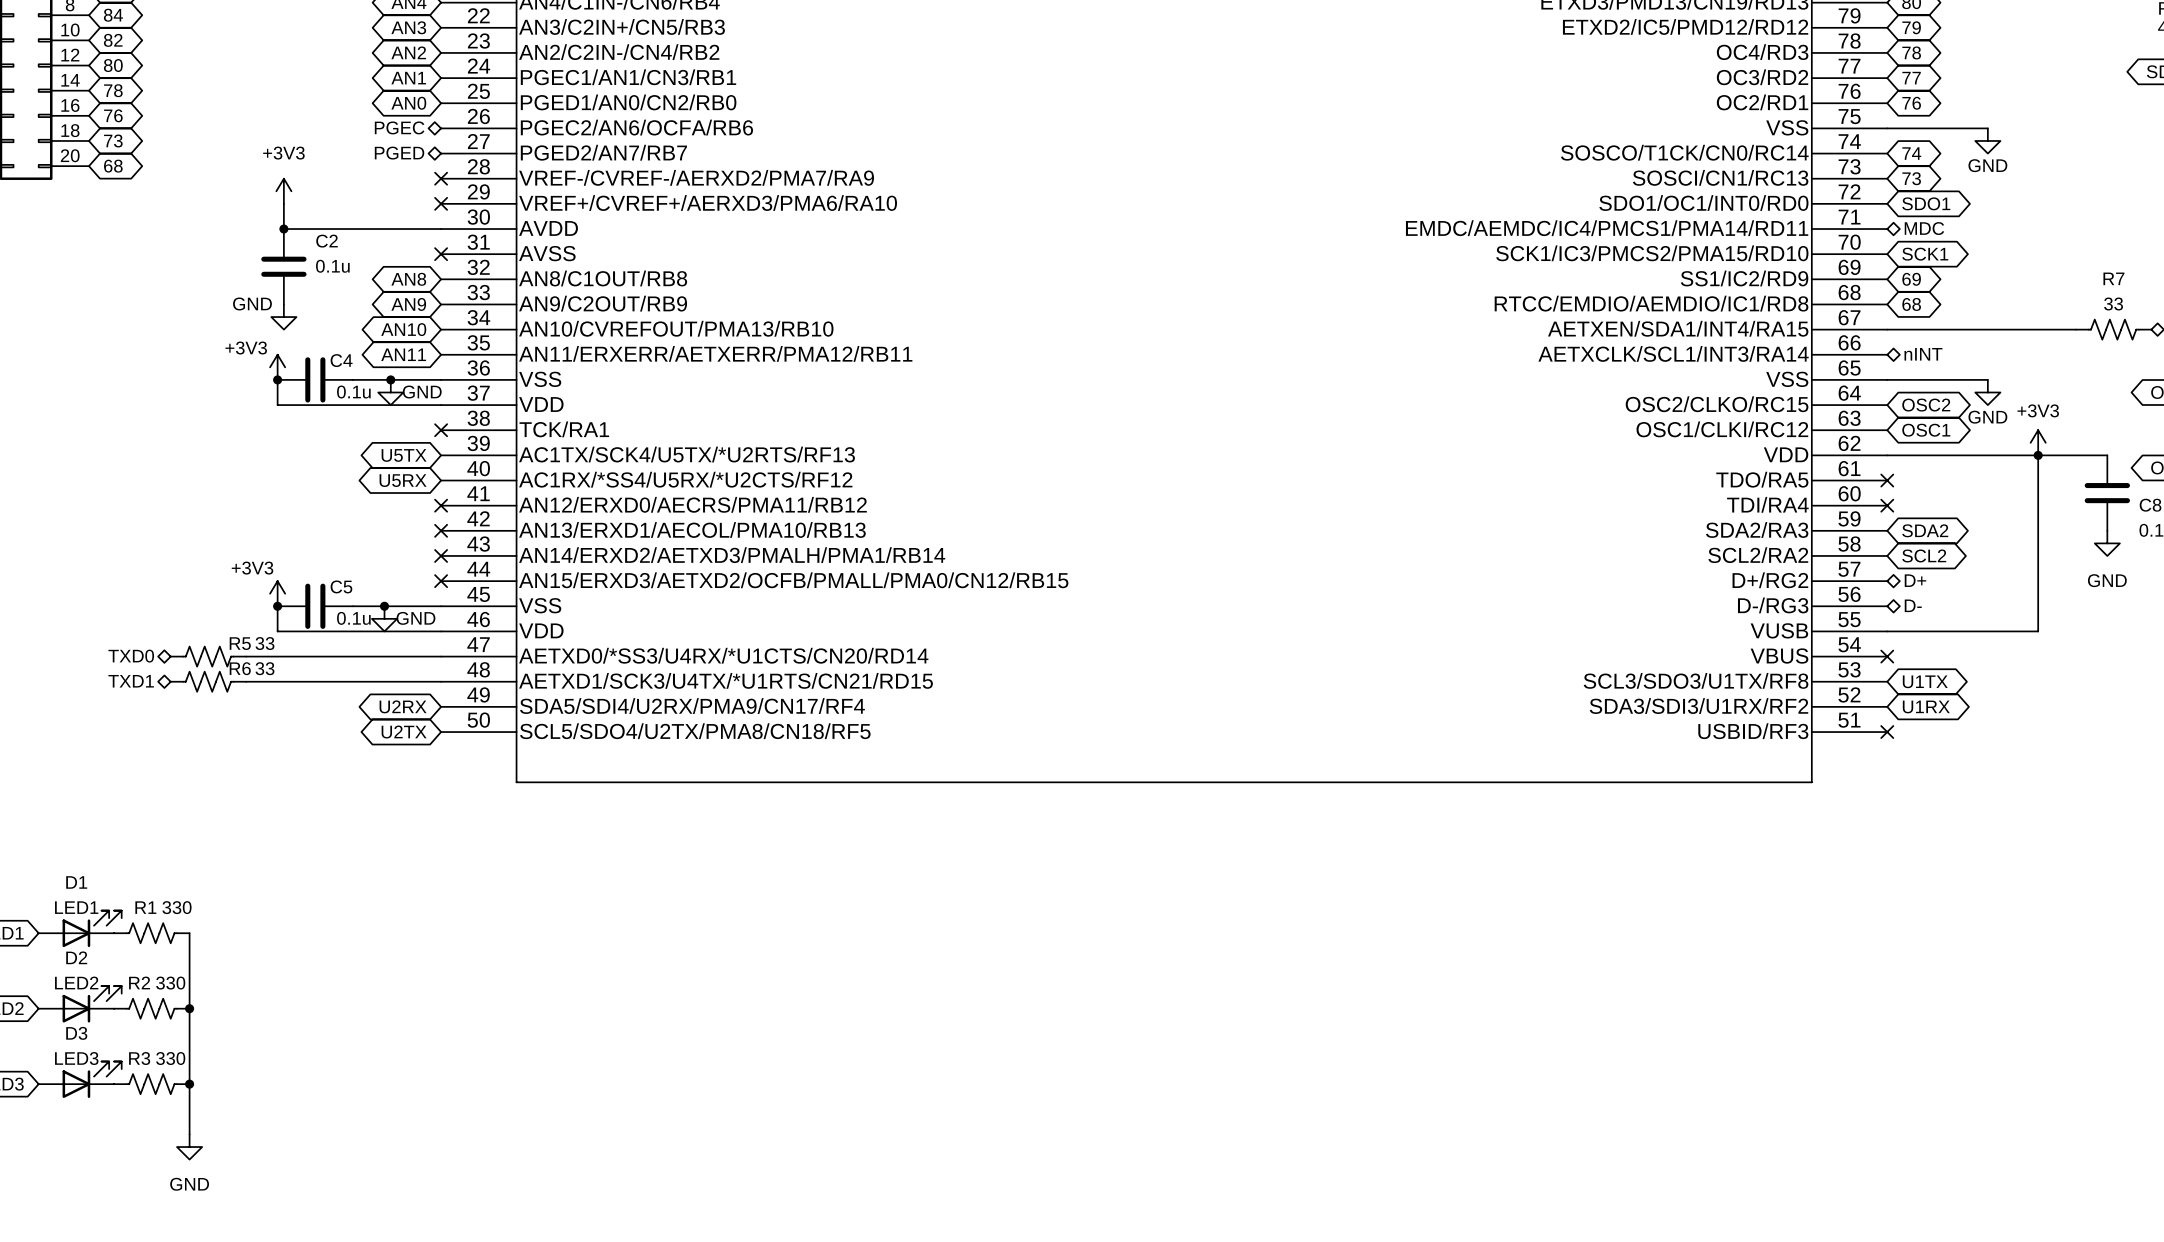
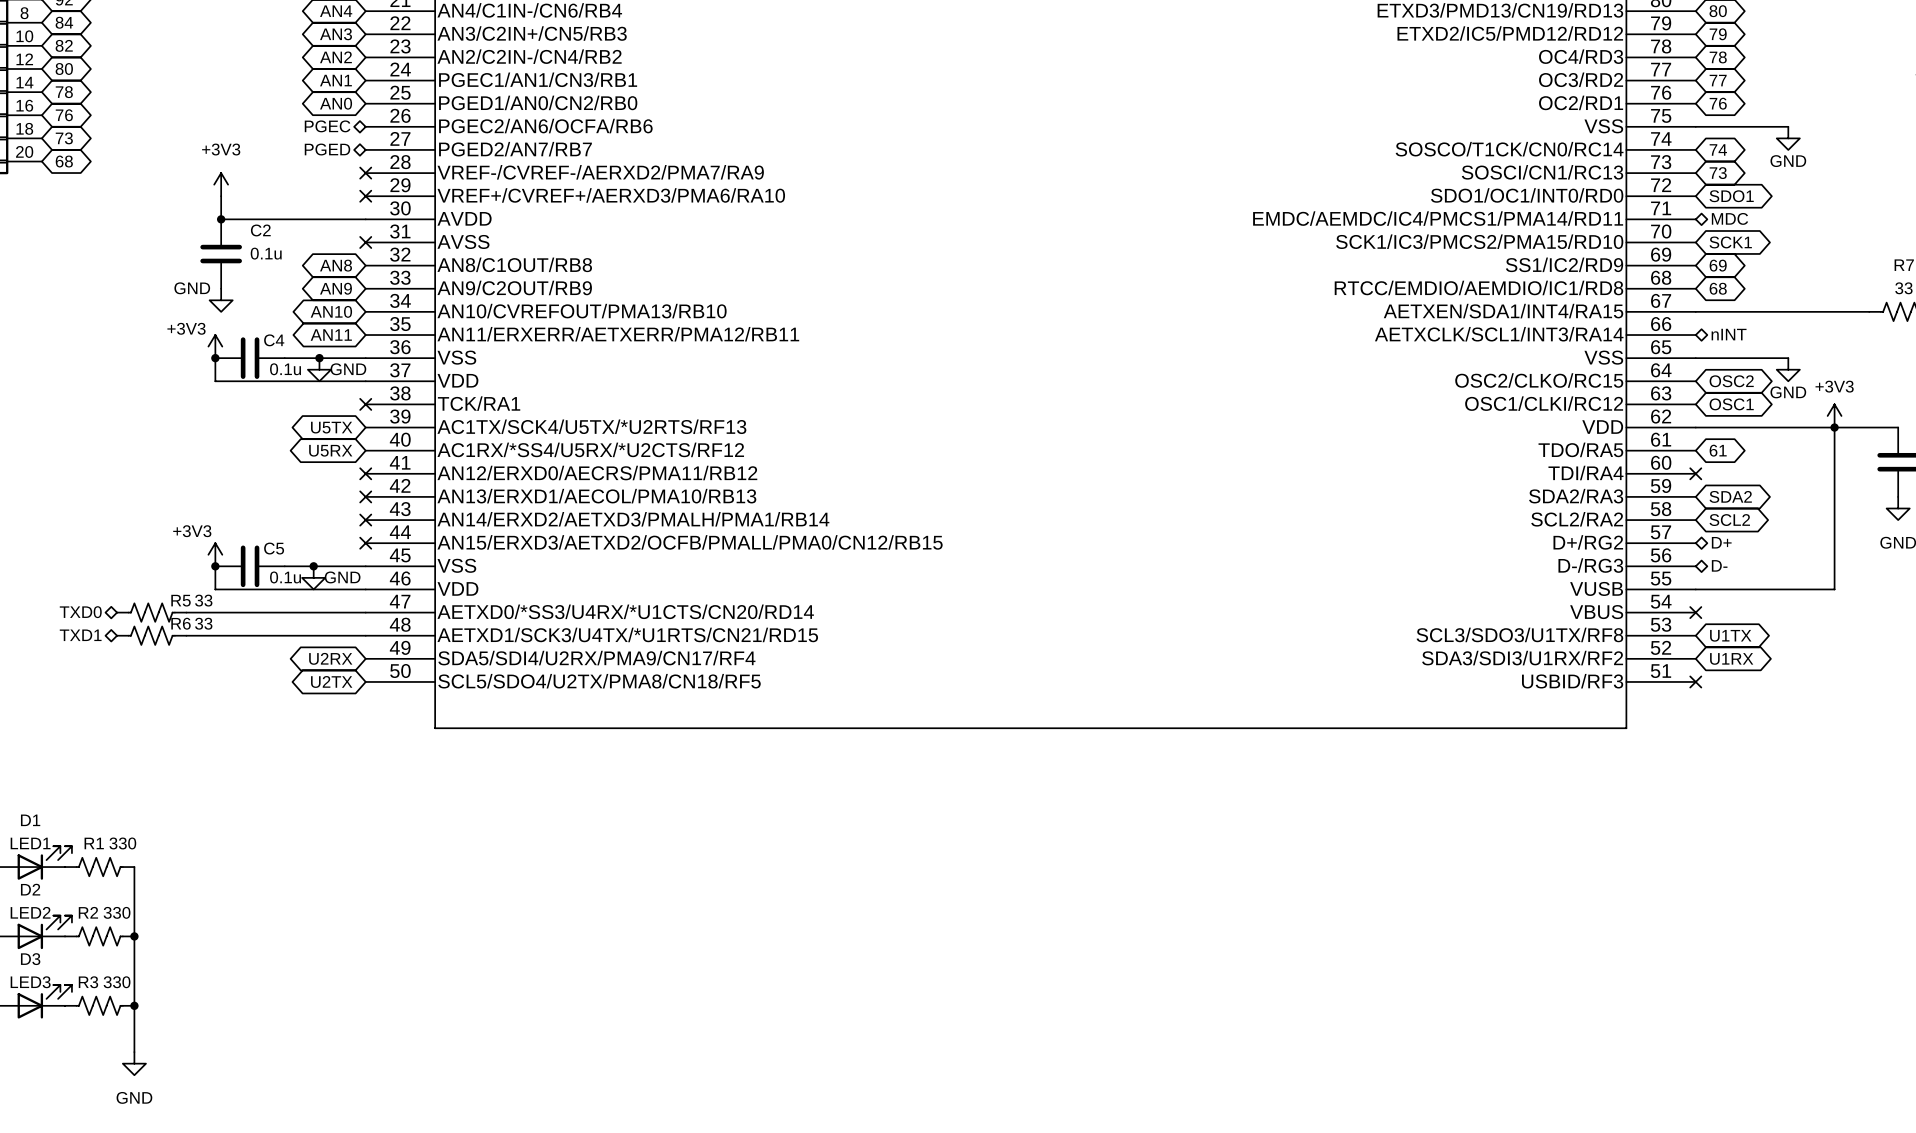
no-connect mark: (1887, 480) -> none
global label: none -> 61 (1718, 450)

